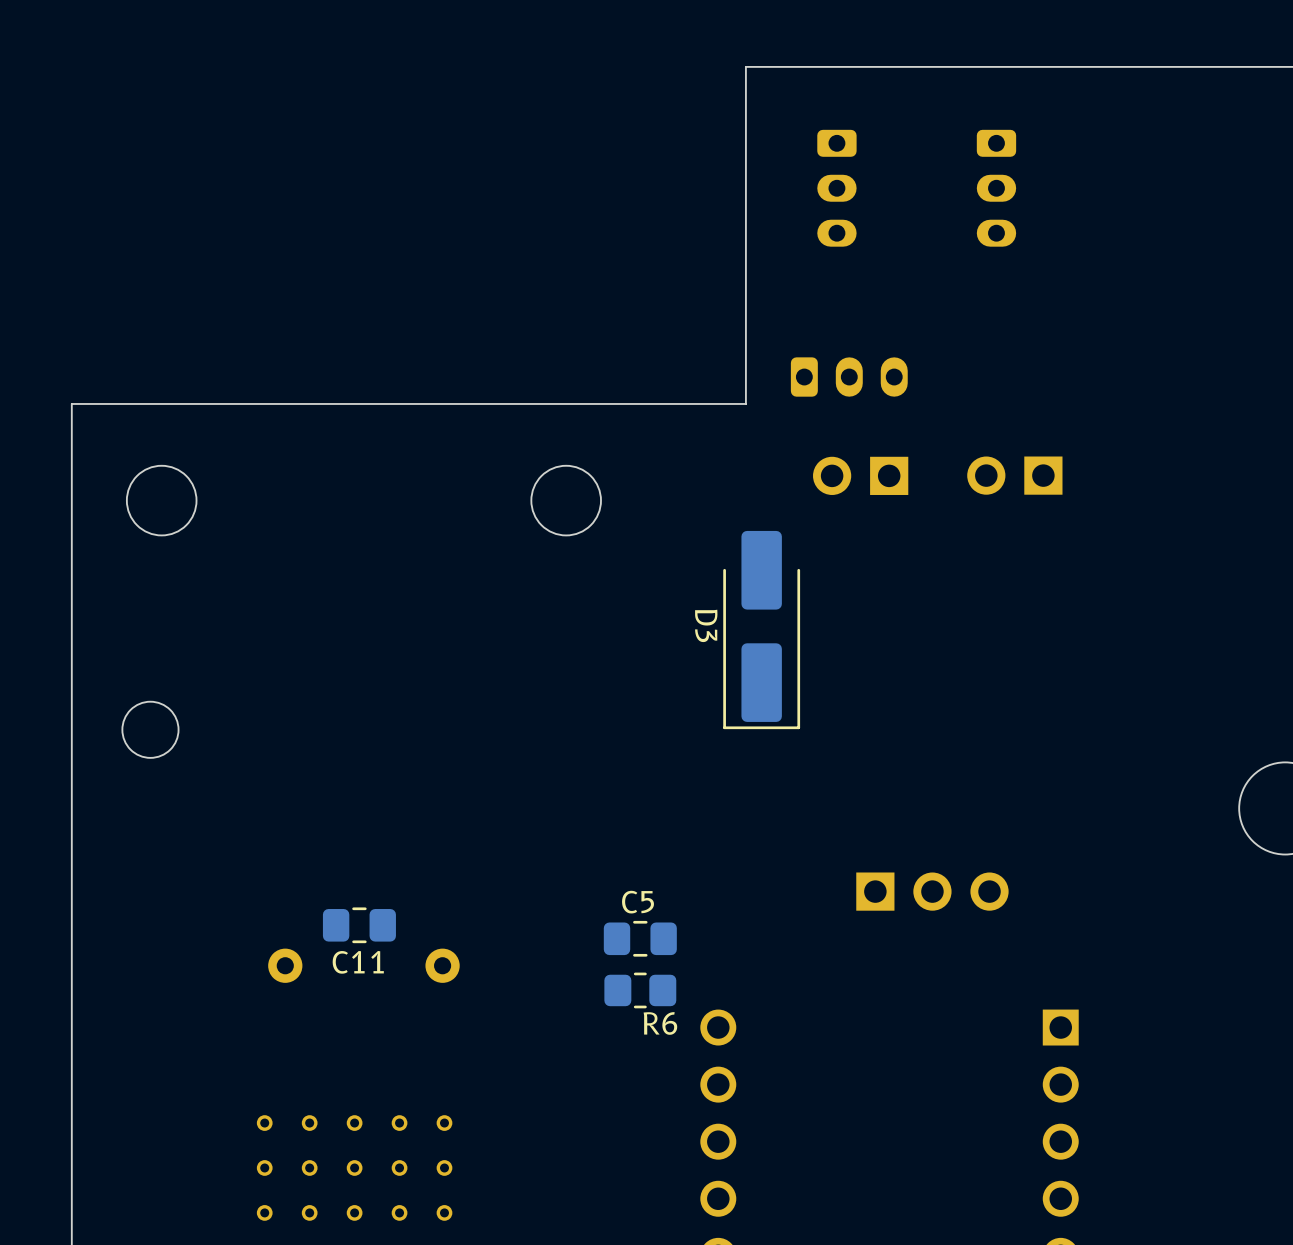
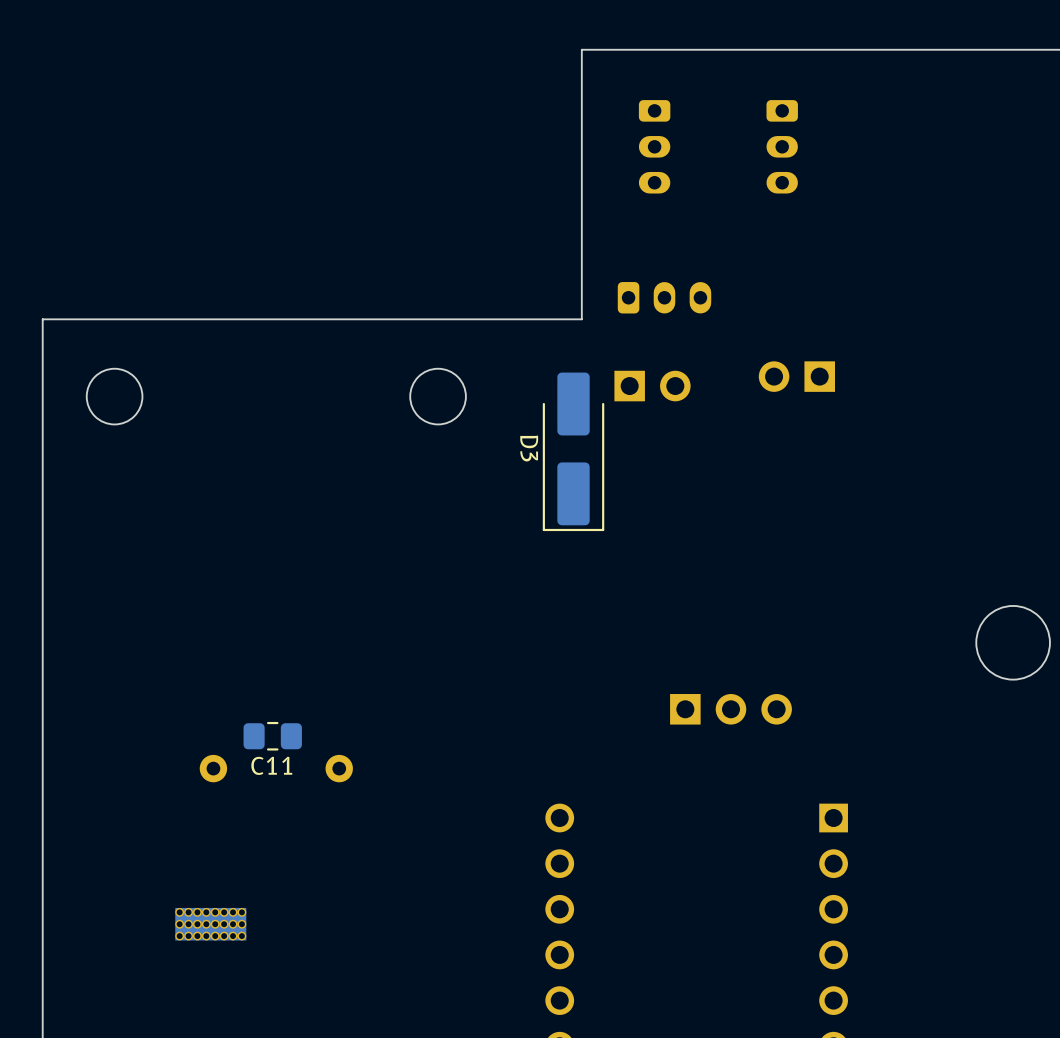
part rotation: 0° (860, 475) -> 180° (652, 386)
D3 position: (761, 630) -> (573, 451)
round board edge: [121, 701, 180, 759] -> none
C5: (640, 938) -> none
R6: (640, 990) -> none
part: none -> (210, 924)
part: (354, 1167) -> none

